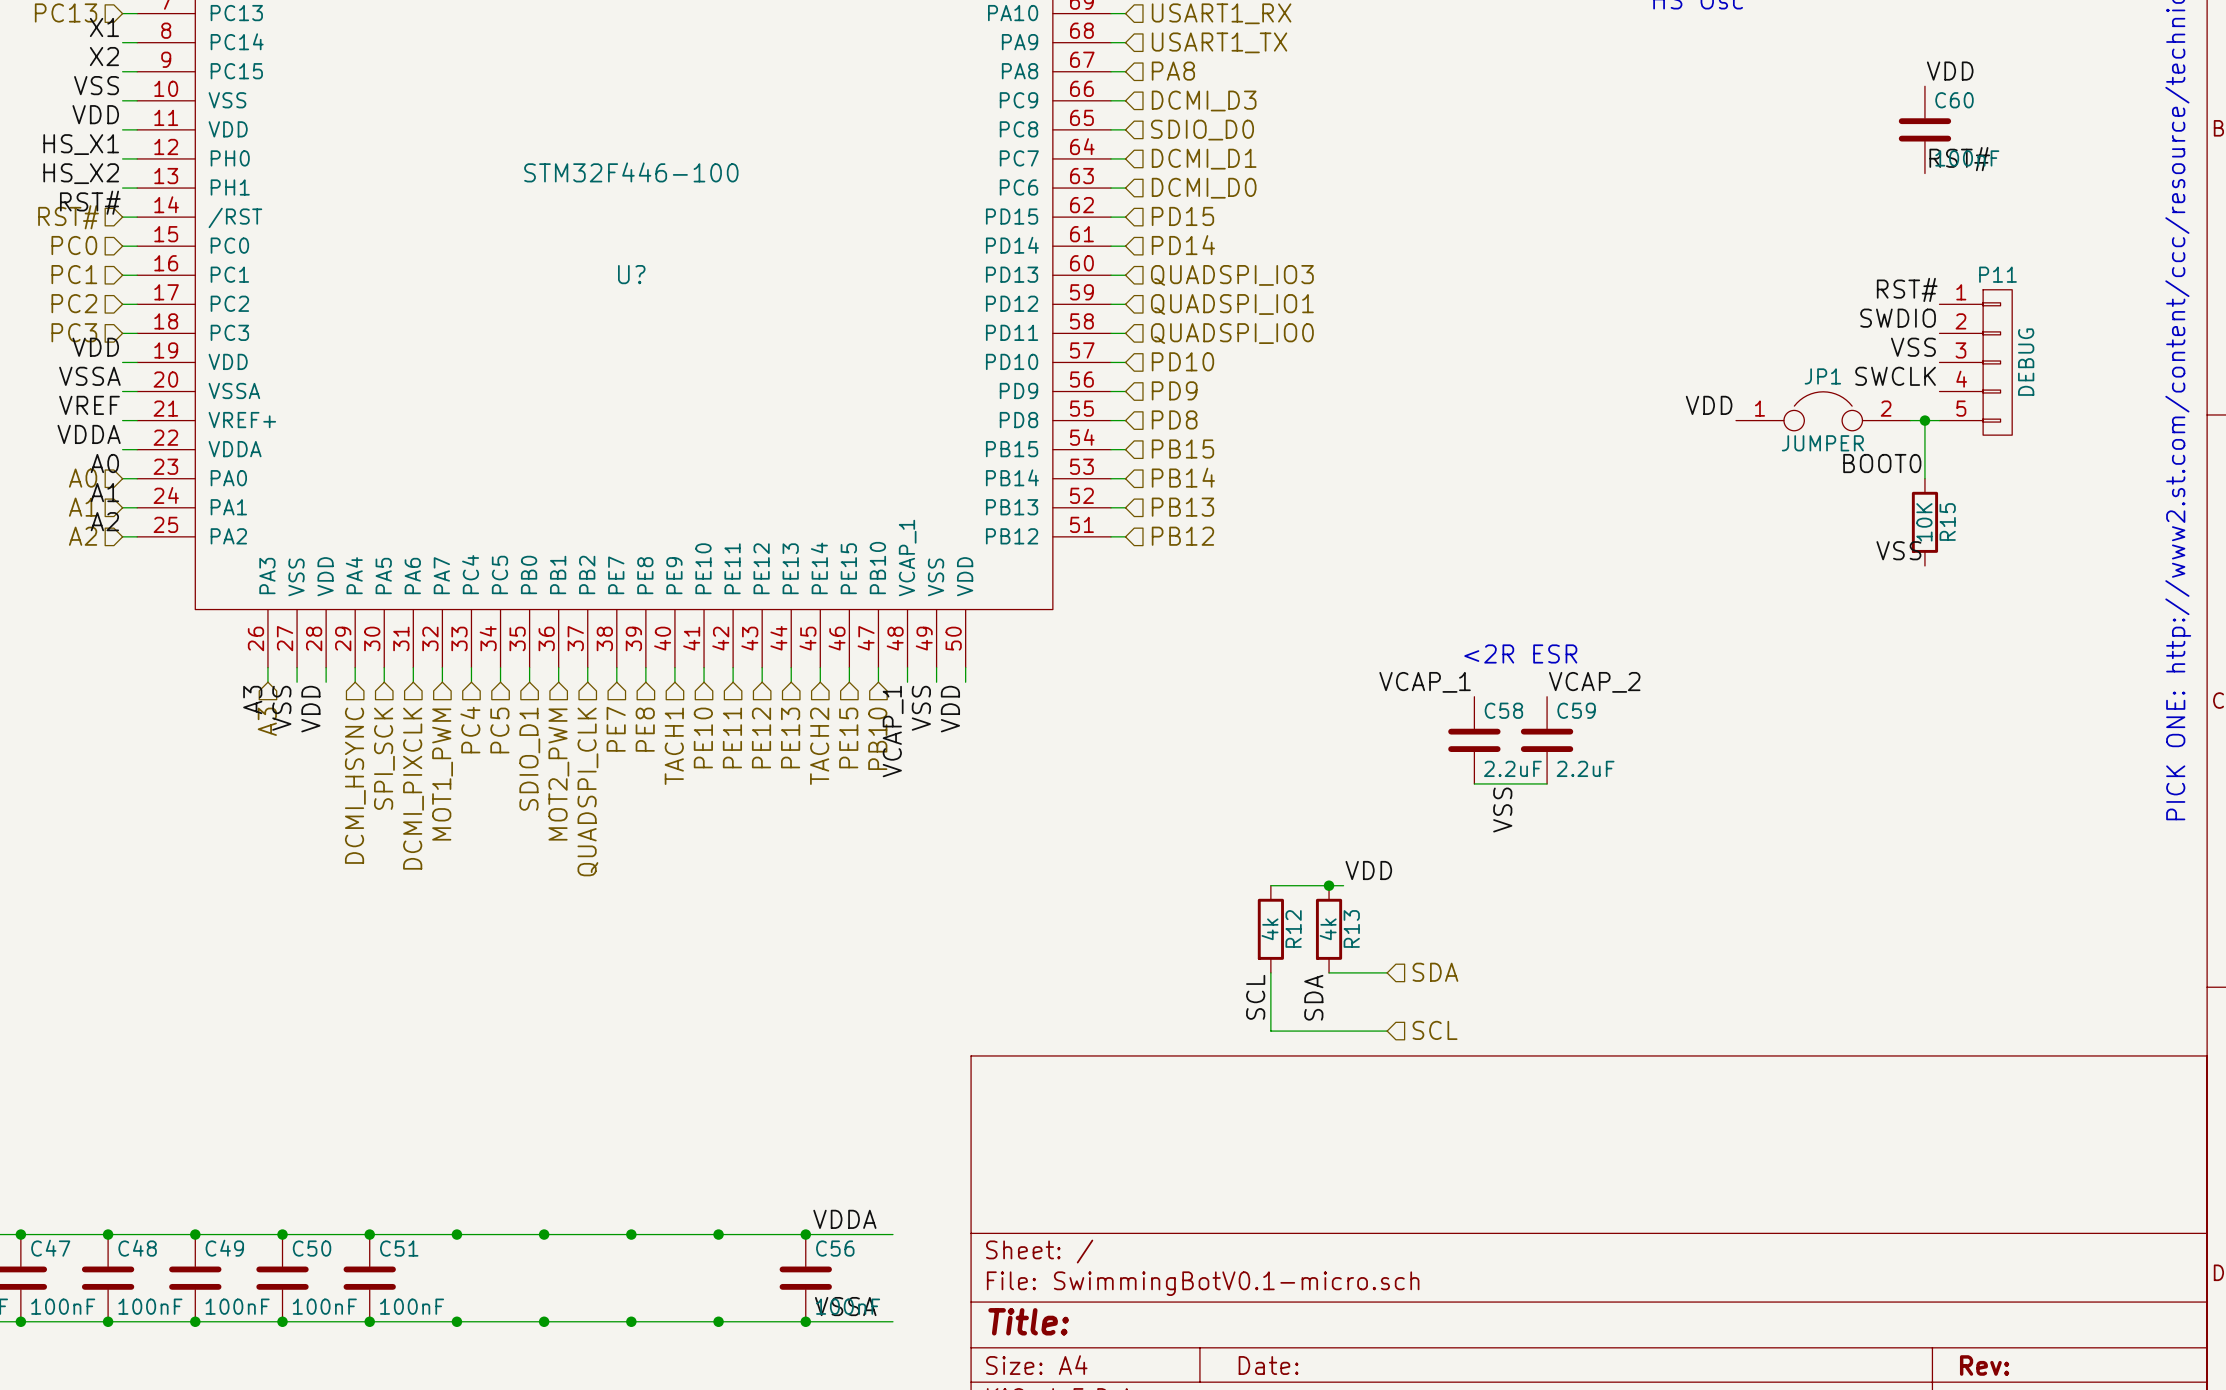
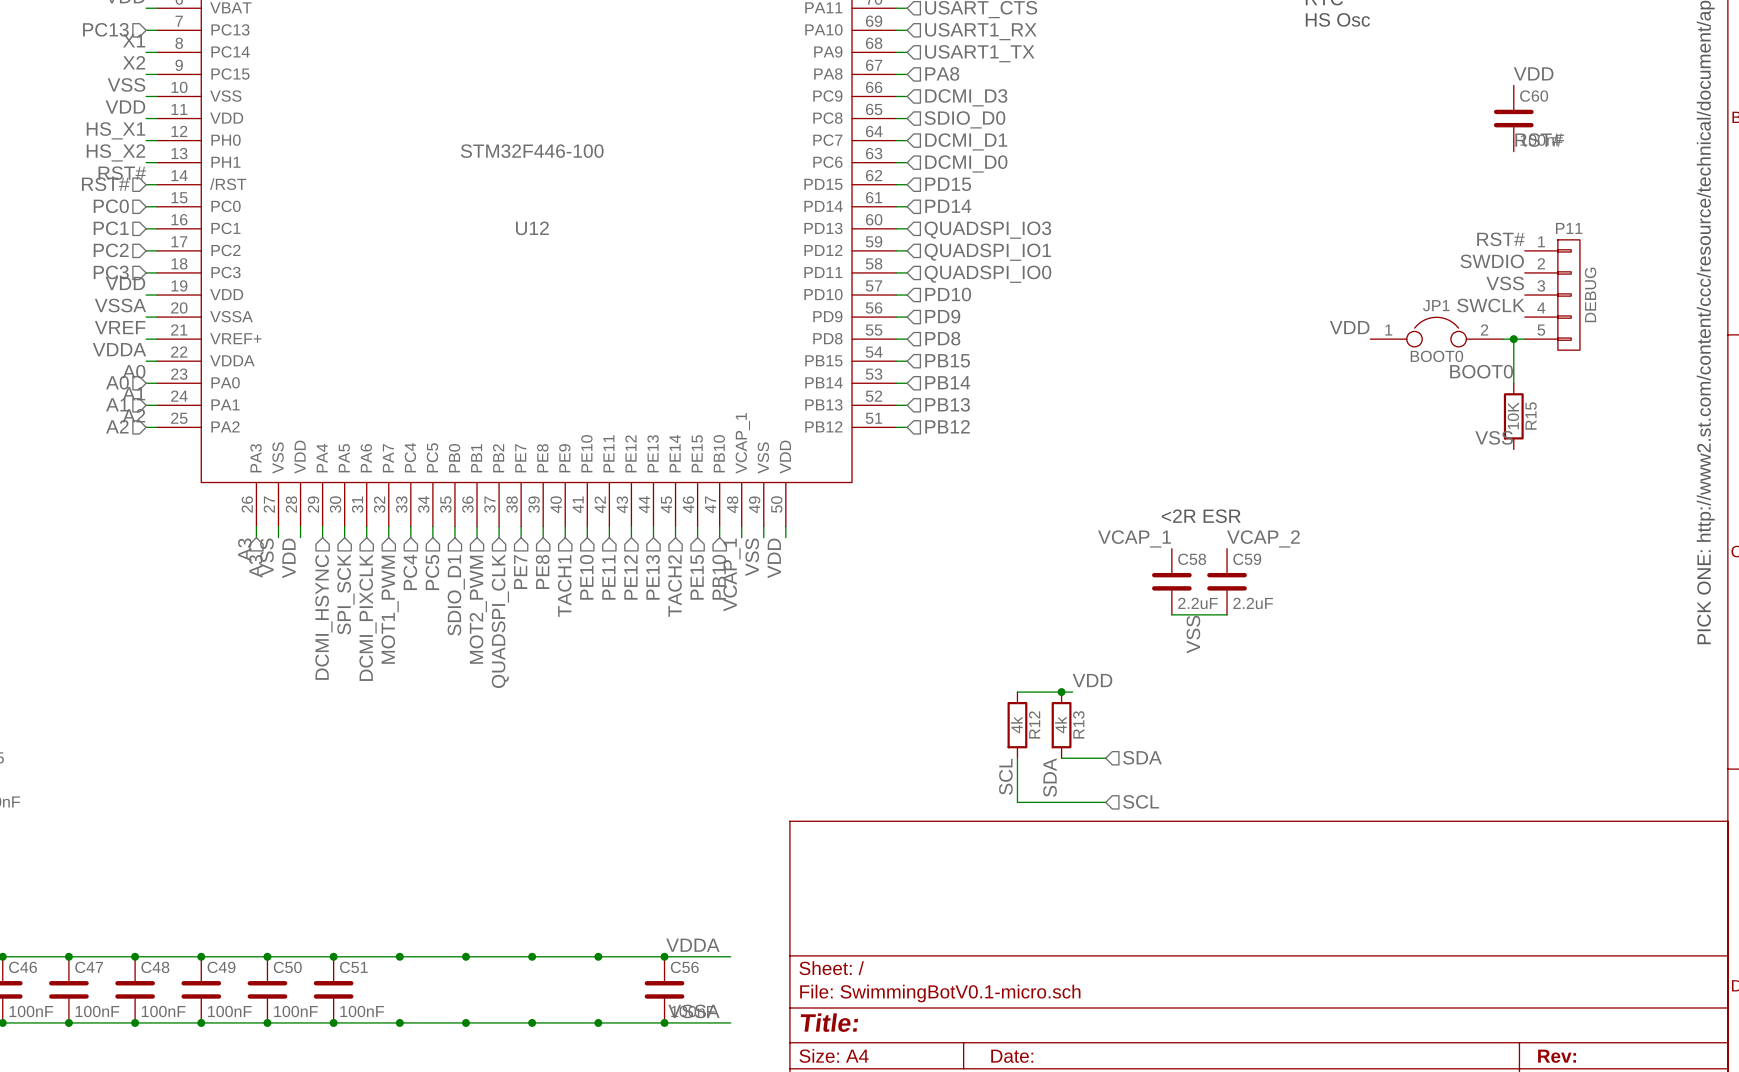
U? name: U? (631, 274) -> U12 (532, 228)
JP1 value: JUMPER (1822, 443) -> BOOT0 (1436, 356)

